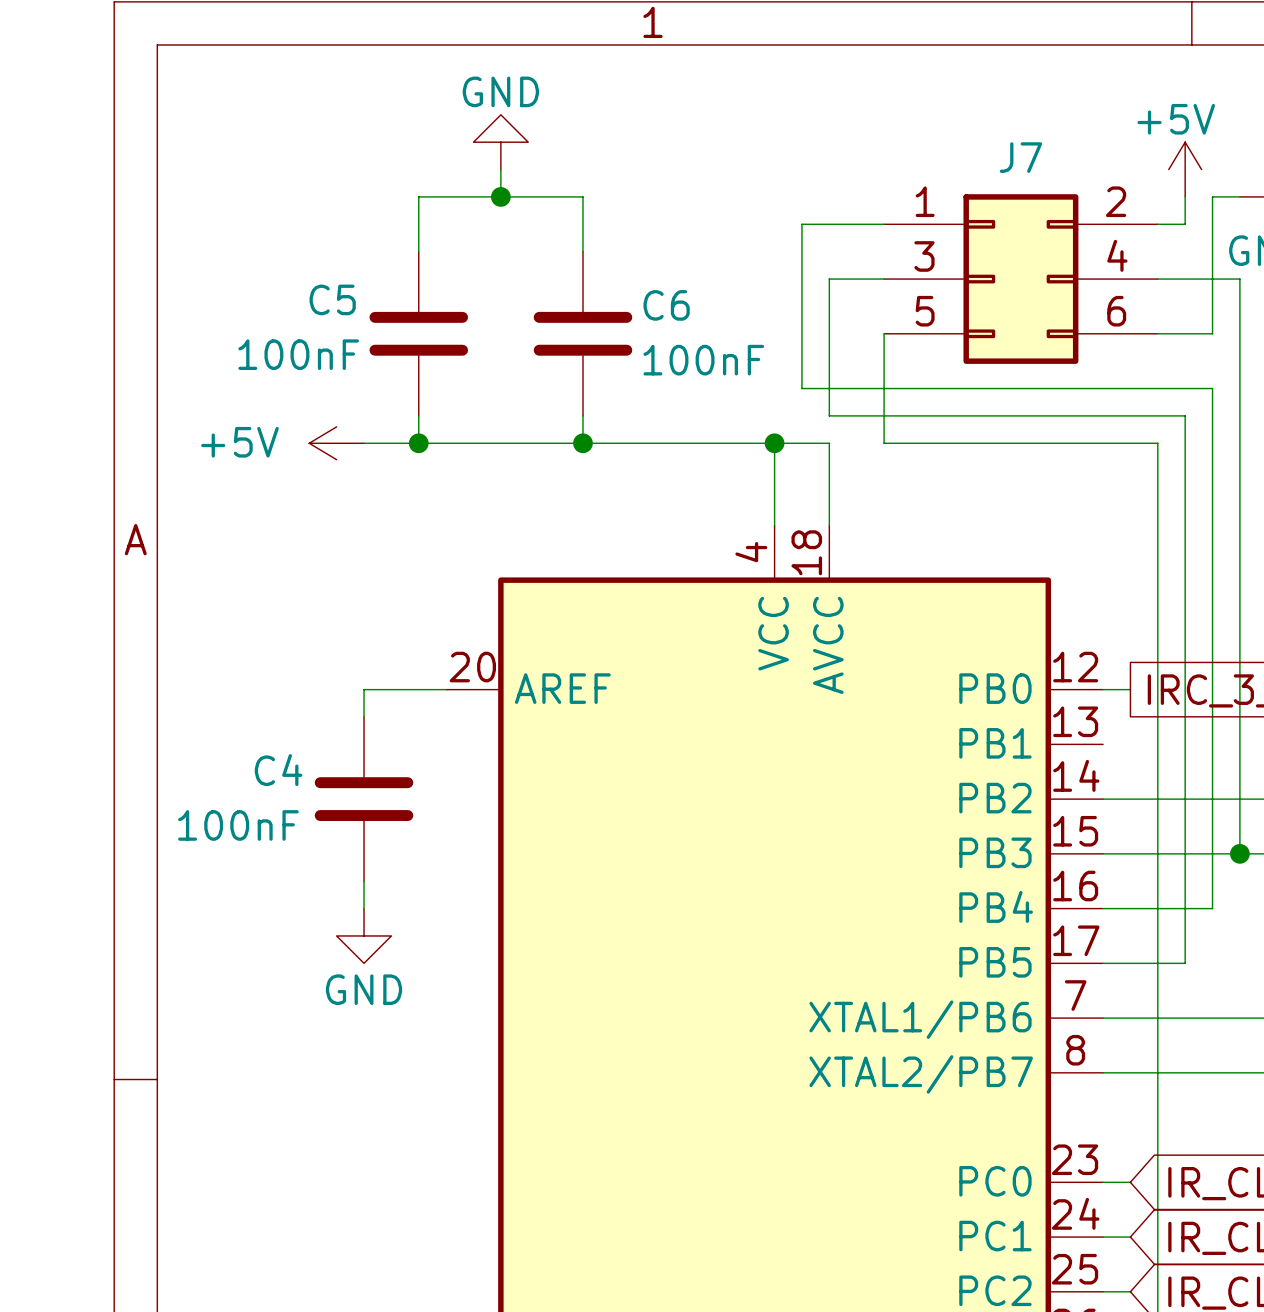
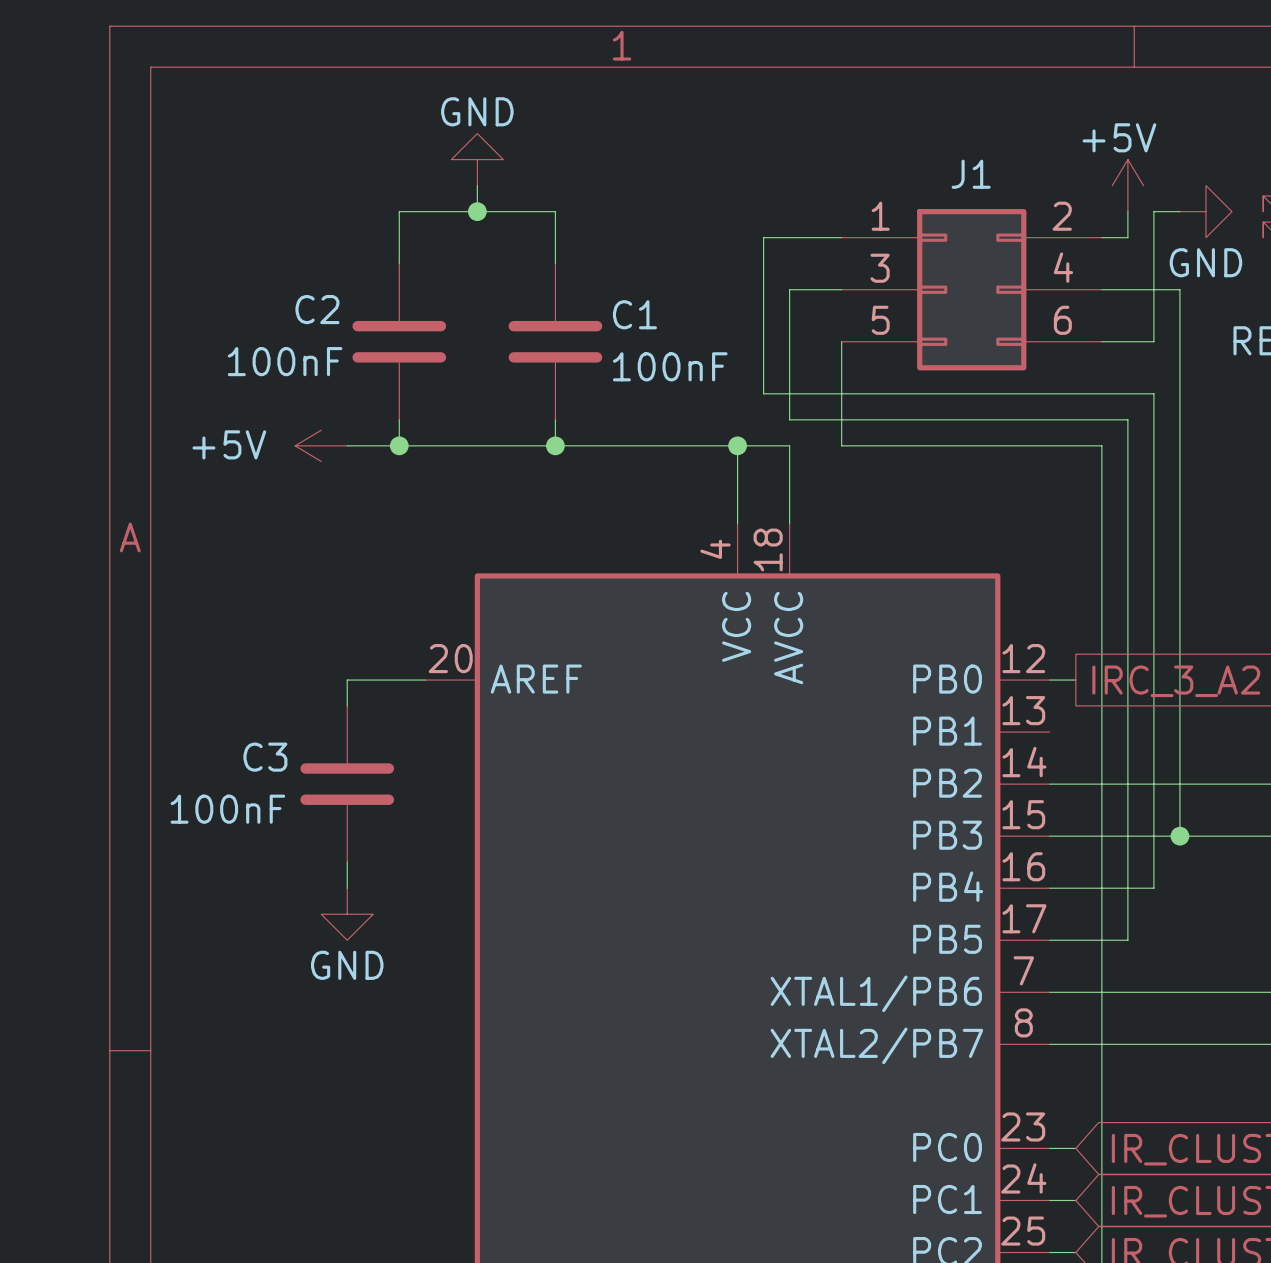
J7 name: J7 (1020, 157) -> J1 (971, 174)
C5 name: C5 (332, 299) -> C2 (317, 309)
C6 name: C6 (666, 305) -> C1 (634, 314)
C4 name: C4 (278, 770) -> C3 (265, 757)

